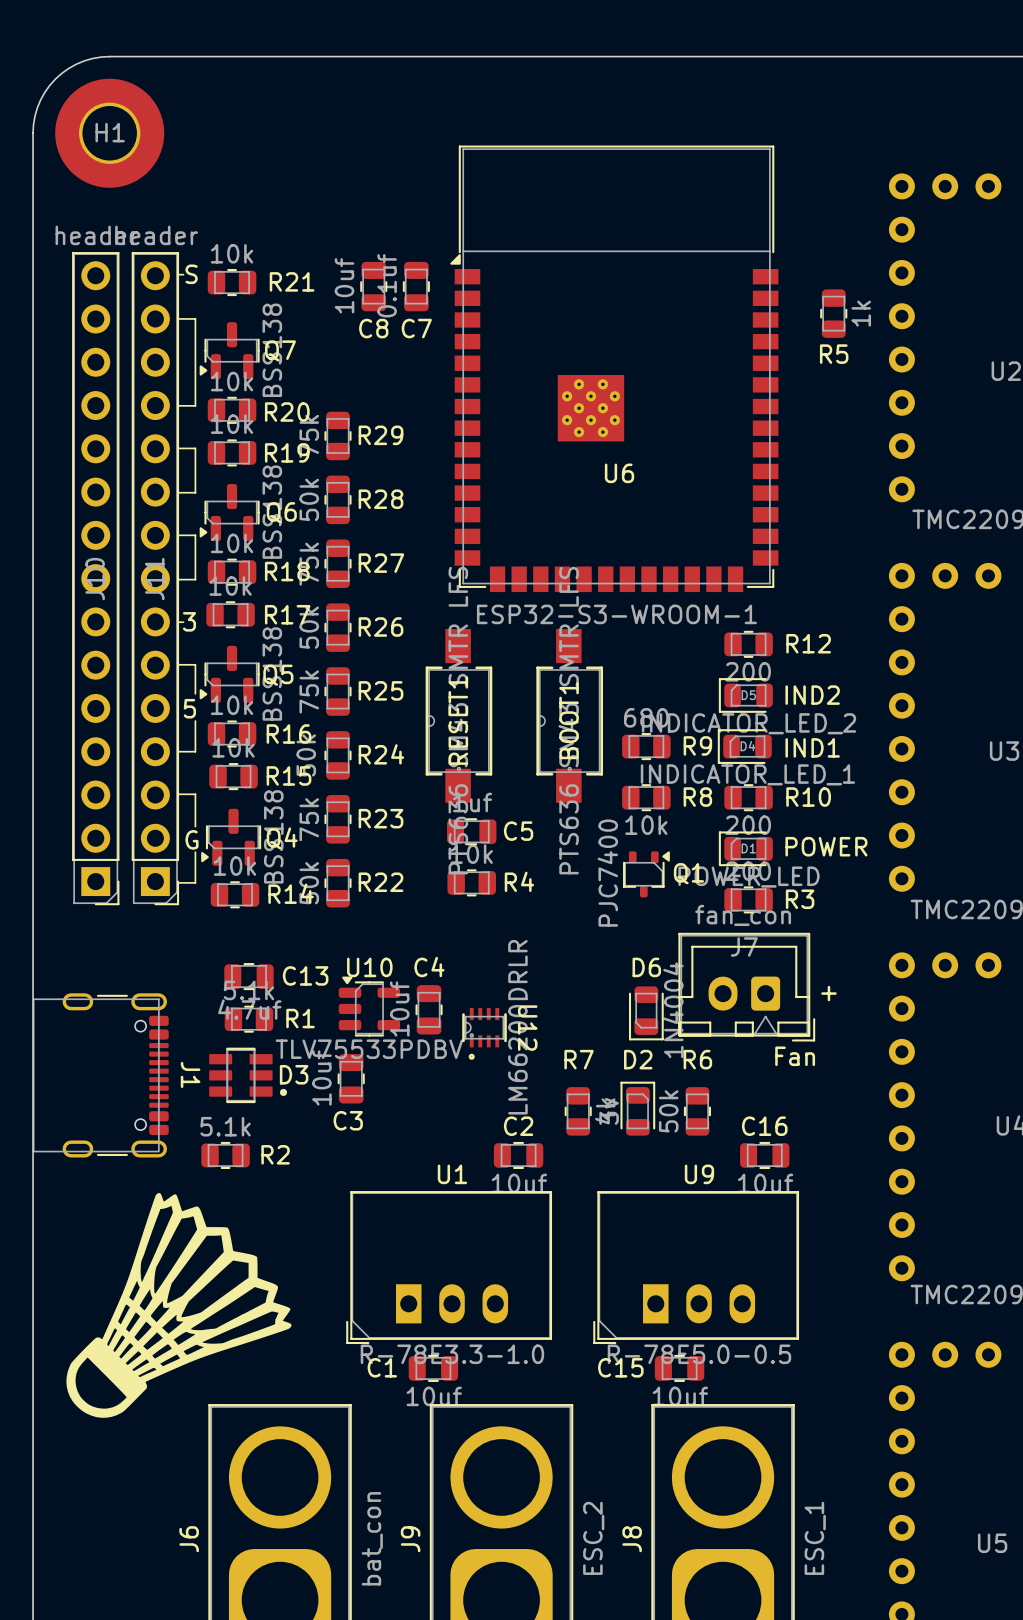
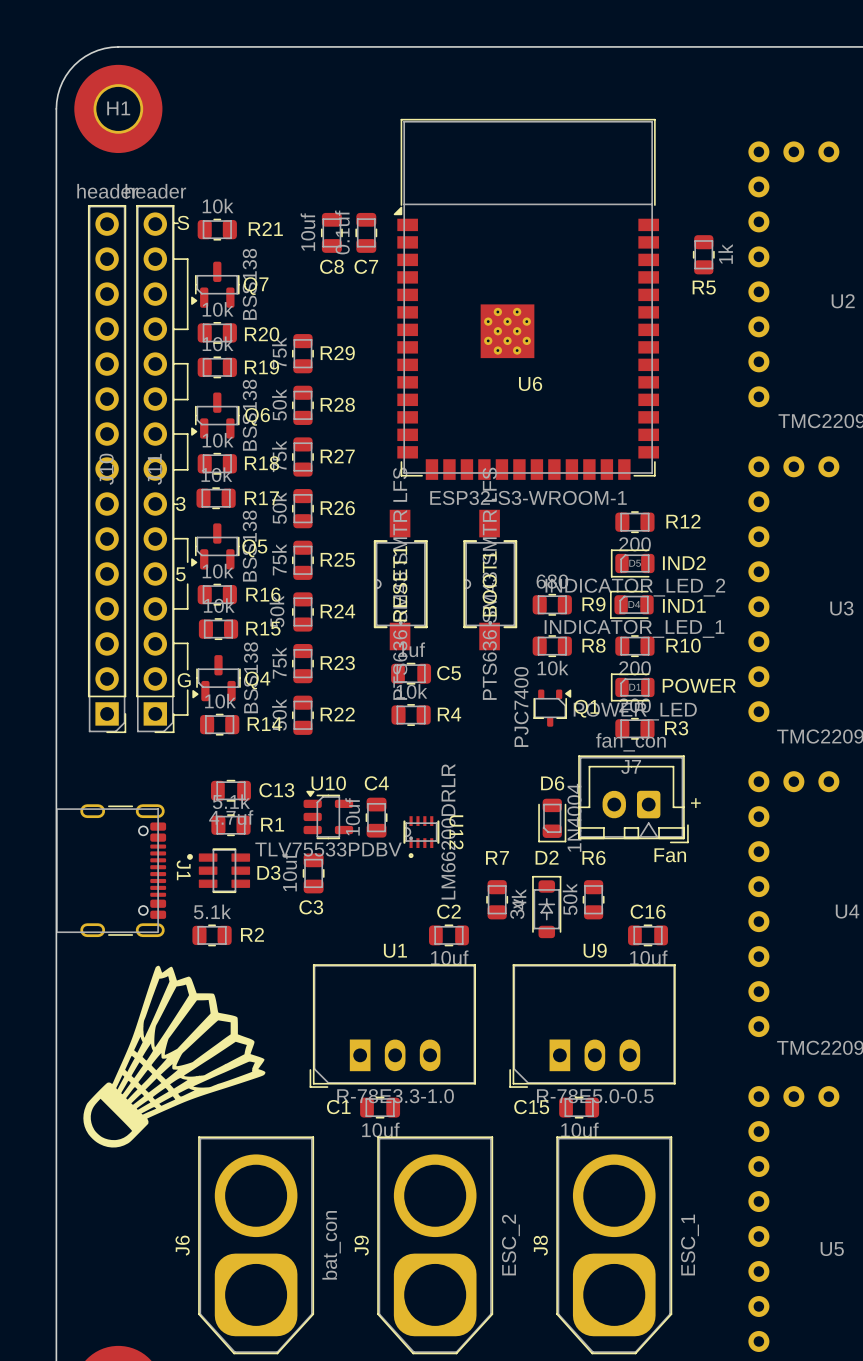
D3 rotation: 0° (248, 1075) -> 180° (218, 870)
D2 footprint: [620, 1081, 656, 1136] -> [532, 875, 562, 939]

